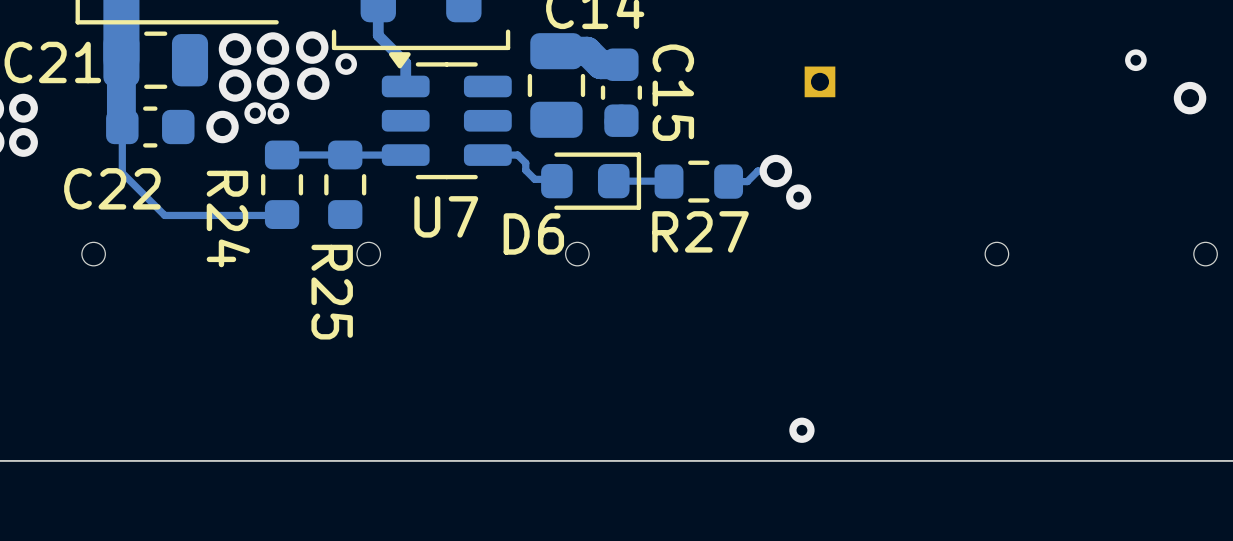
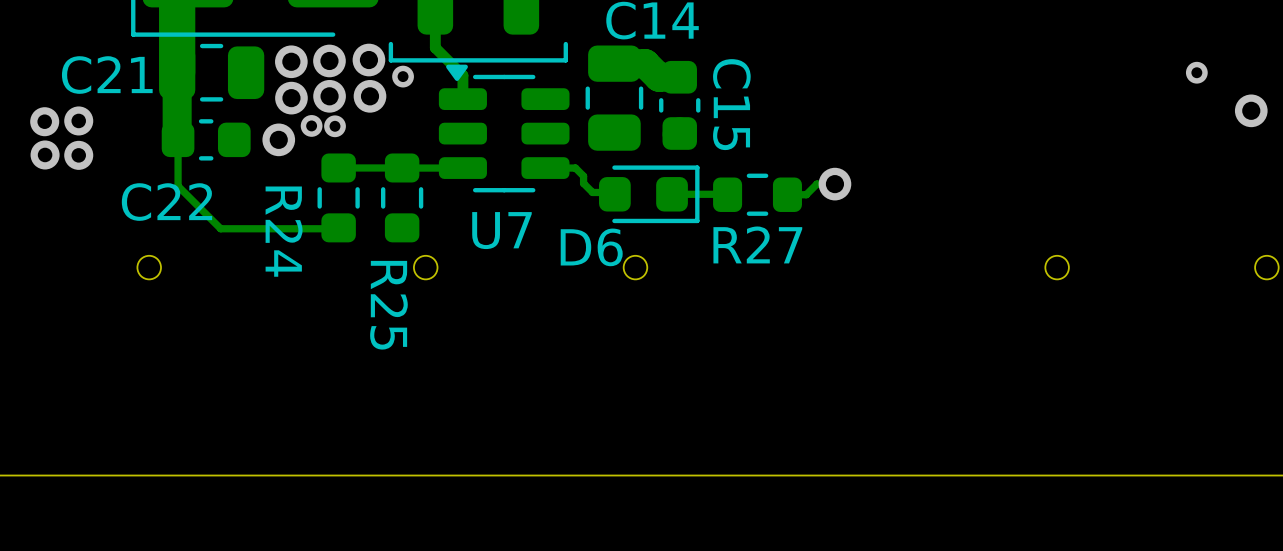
part: (819, 81) -> none
via: (798, 197) -> none
via: (801, 430) -> none

